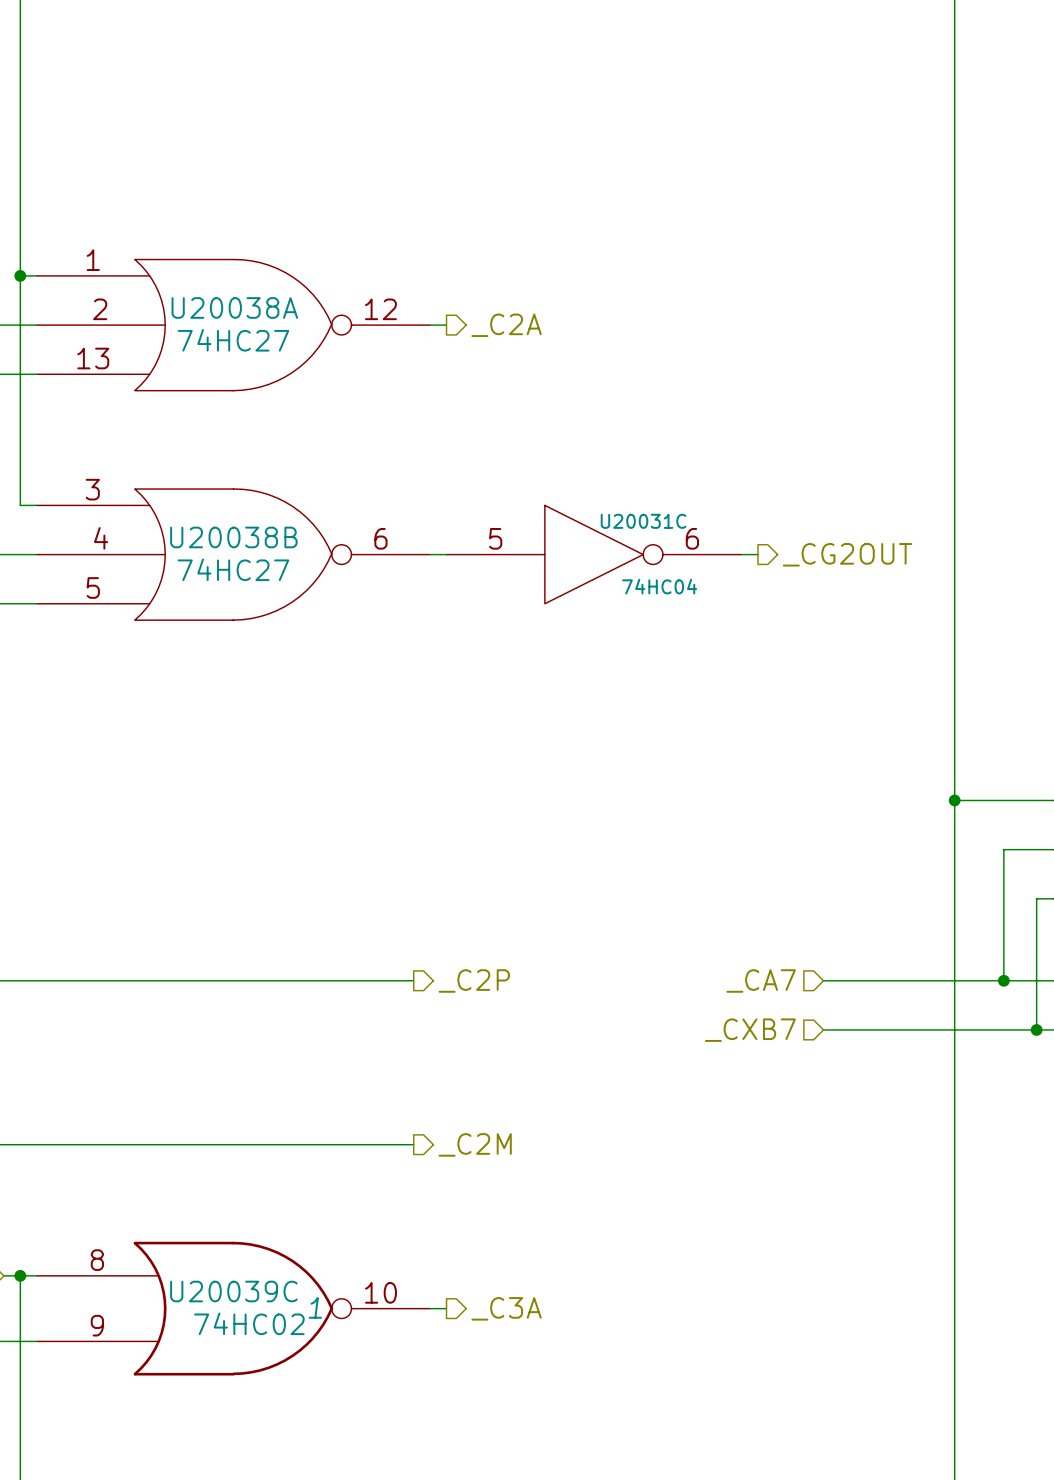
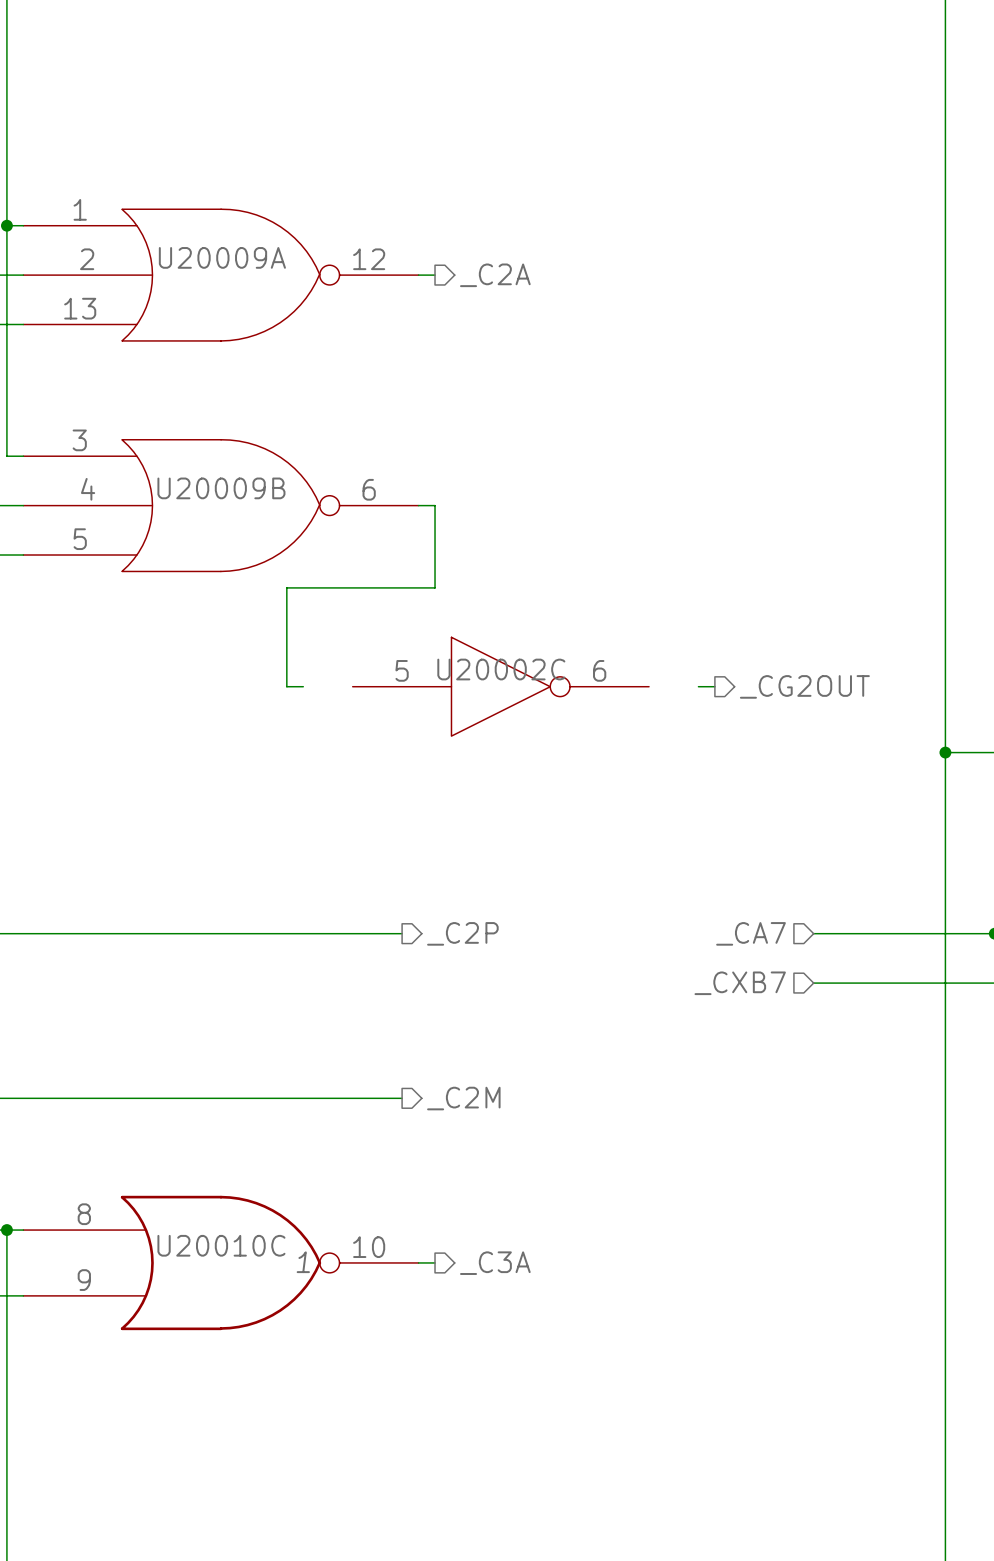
U20038A name: U20038A (234, 307) -> U20009A (222, 257)
U20038A value: 74HC27 (233, 340) -> none
U20038B name: U20038B (233, 537) -> U20009B (221, 488)
wire: none -> (435, 505) (435, 587) (286, 587) (286, 686) (303, 686)
U20031C: 74HC04 (594, 554) -> none
wire: (741, 554) (757, 554) -> (698, 686) (714, 686)
hierarchical label position: _CG2OUT (847, 554) -> _CG2OUT (804, 686)
U20038B value: 74HC27 (233, 569) -> none
U20002C: none -> (500, 686)
U20039C name: U20039C (233, 1291) -> U20010C (221, 1245)
U20039C value: 74HC02 (249, 1323) -> none

